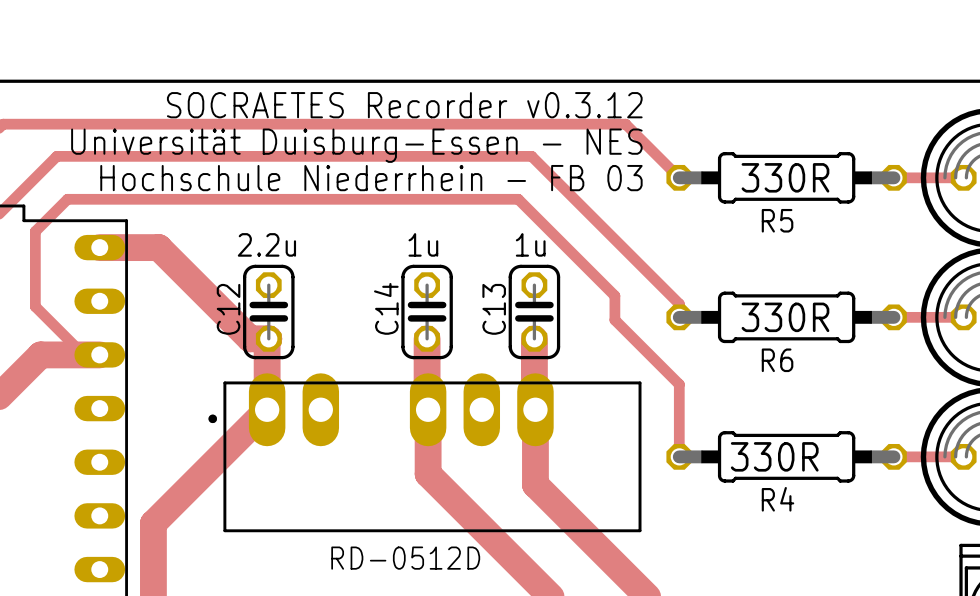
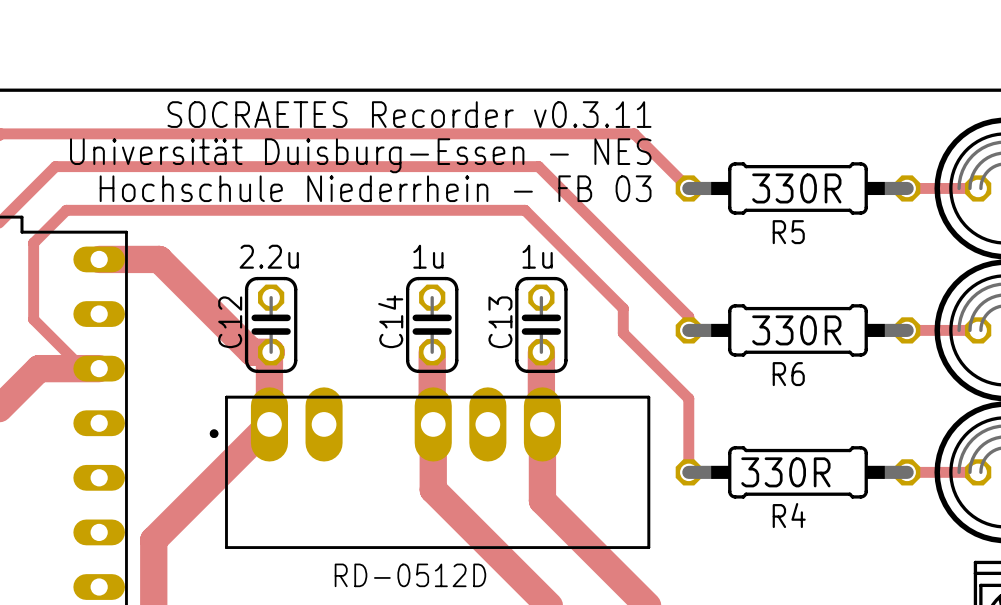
text: SOCRAETES Recorder v0.3.12 (404, 105) -> SOCRAETES Recorder v0.3.11 (409, 114)

